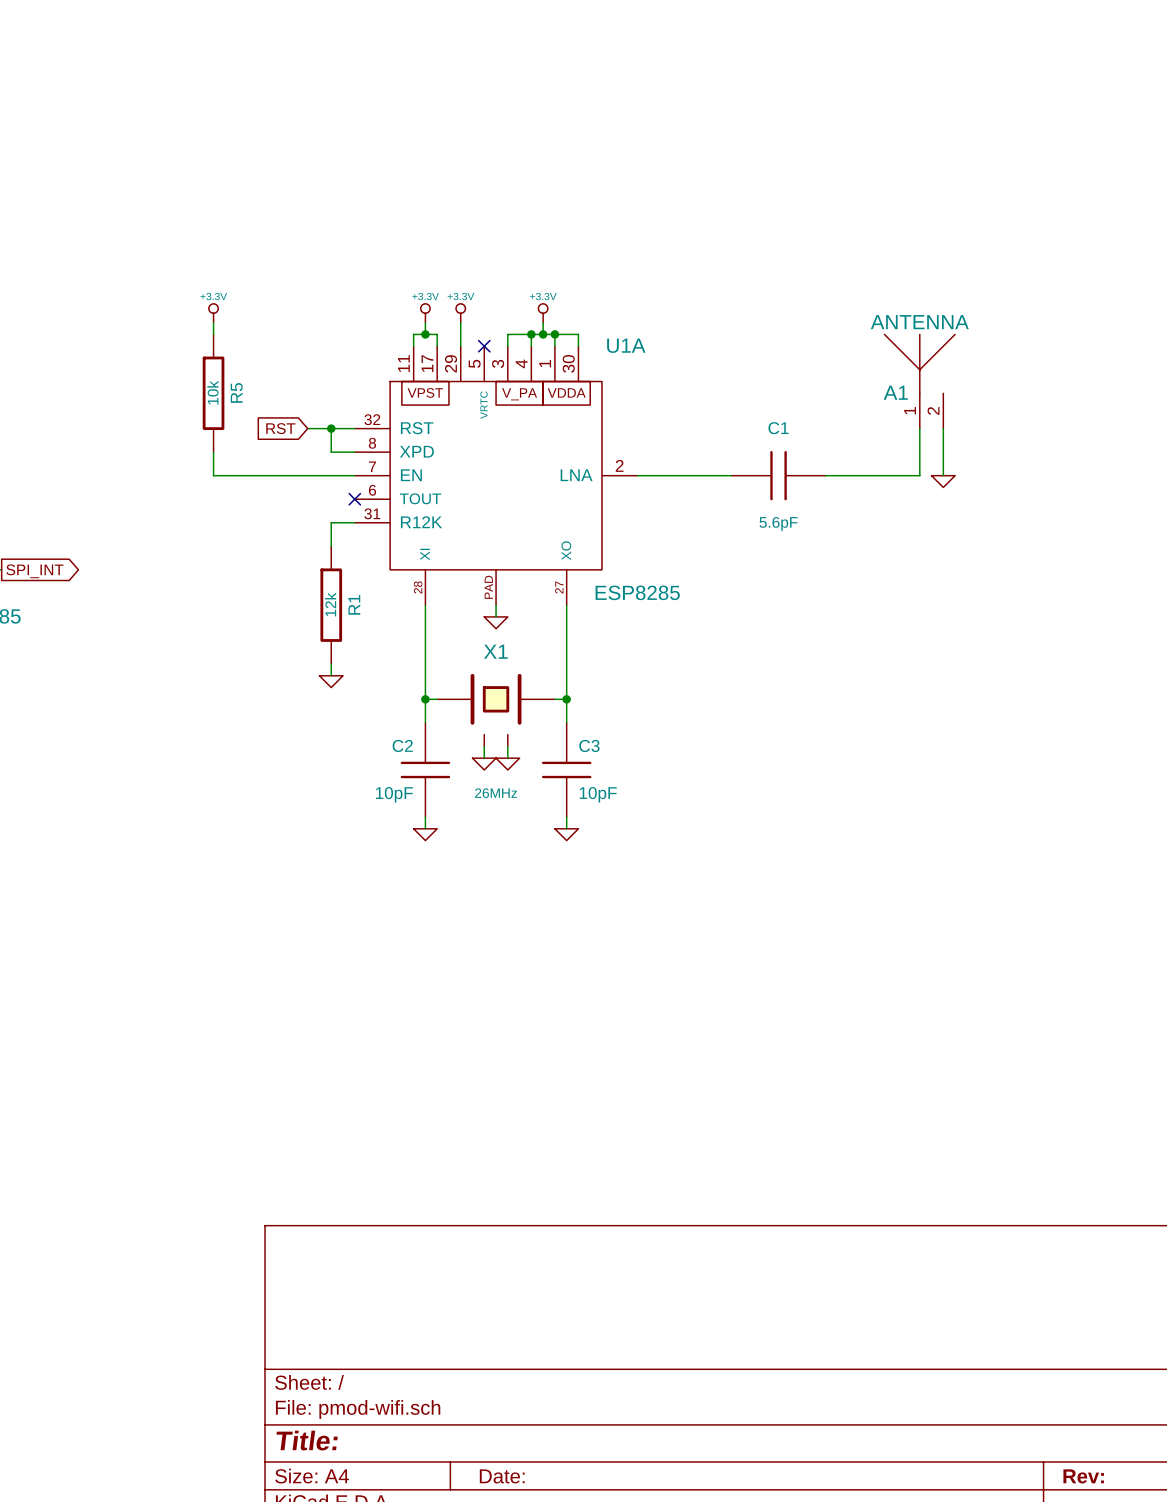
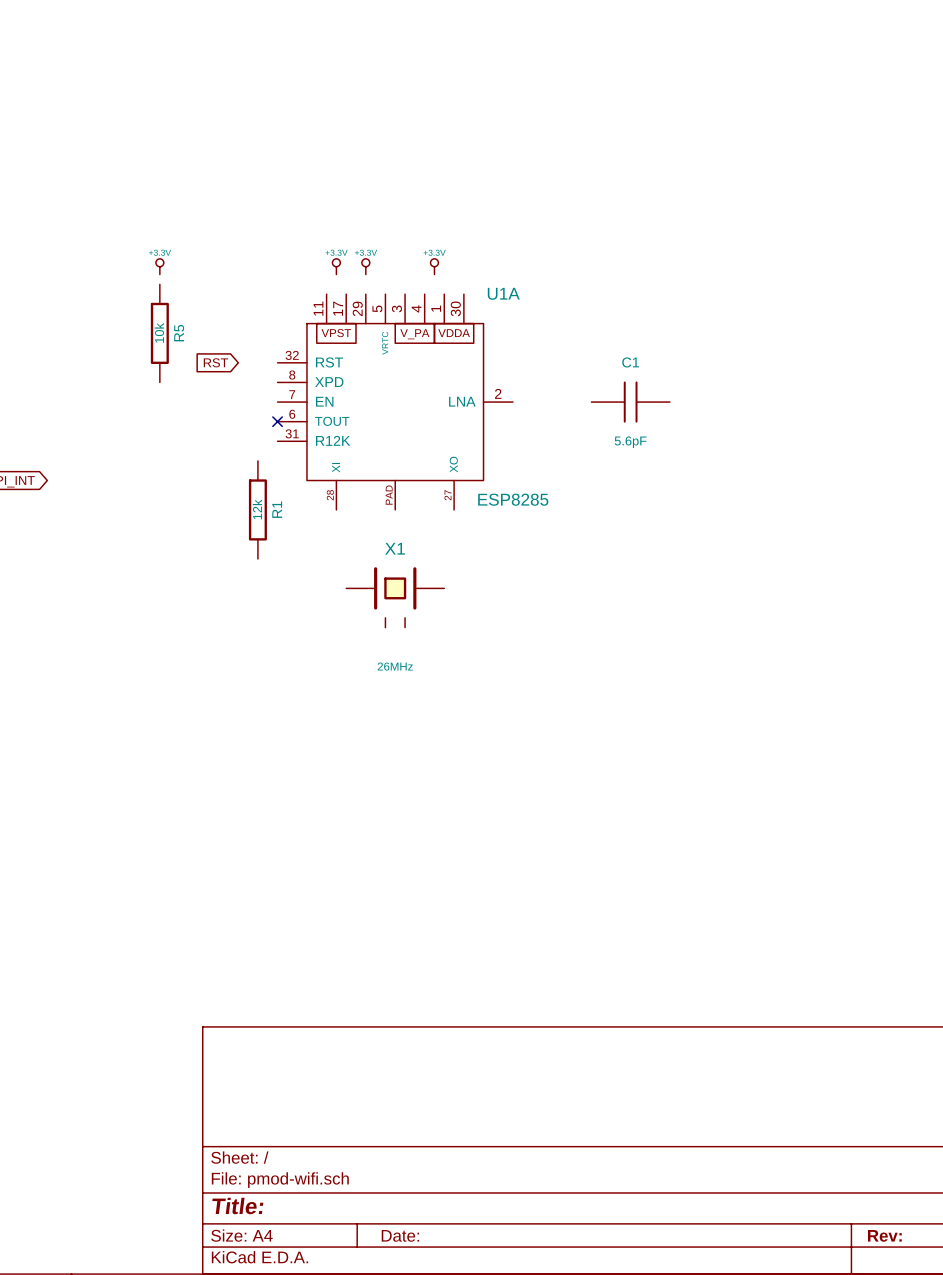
wire: (213, 322) (213, 334) -> none
wire: (425, 322) (425, 334) -> none
wire: (460, 322) (460, 346) -> none
wire: (543, 322) (543, 334) -> none
junction: (425, 334) -> none
wire: (531, 334) (531, 346) -> none
junction: (531, 334) -> none
junction: (543, 334) -> none
wire: (554, 334) (554, 346) -> none
junction: (554, 334) -> none
wire: (413, 346) (413, 334) (437, 334) (437, 346) -> none
no-connect mark: (484, 346) -> none
wire: (507, 346) (507, 334) (578, 334) (578, 346) -> none
A1: ANTENNA (919, 381) -> none
wire: (307, 428) (354, 428) -> none
wire: (331, 428) (331, 452) (354, 452) -> none
junction: (331, 428) -> none
wire: (919, 428) (919, 475) (825, 475) -> none
wire: (943, 428) (943, 475) -> none
wire: (213, 452) (213, 475) (354, 475) -> none
wire: (637, 475) (731, 475) -> none
power symbol: (943, 481) -> none
wire: (354, 522) (331, 522) (331, 546) -> none
wire: (425, 605) (425, 722) -> none
wire: (496, 605) (496, 616) -> none
wire: (566, 605) (566, 722) -> none
power symbol: (496, 622) -> none
wire: (331, 664) (331, 675) -> none
power symbol: (331, 681) -> none
wire: (425, 699) (437, 699) -> none
junction: (425, 699) -> none
wire: (554, 699) (566, 699) -> none
junction: (566, 699) -> none
wire: (484, 746) (484, 758) -> none
wire: (507, 746) (507, 758) -> none
power symbol: (484, 764) -> none
power symbol: (507, 764) -> none
C2: 10pF (425, 769) -> none
C3: 10pF (566, 769) -> none
wire: (425, 817) (425, 828) -> none
wire: (566, 817) (566, 828) -> none
power symbol: (425, 834) -> none
power symbol: (566, 834) -> none

